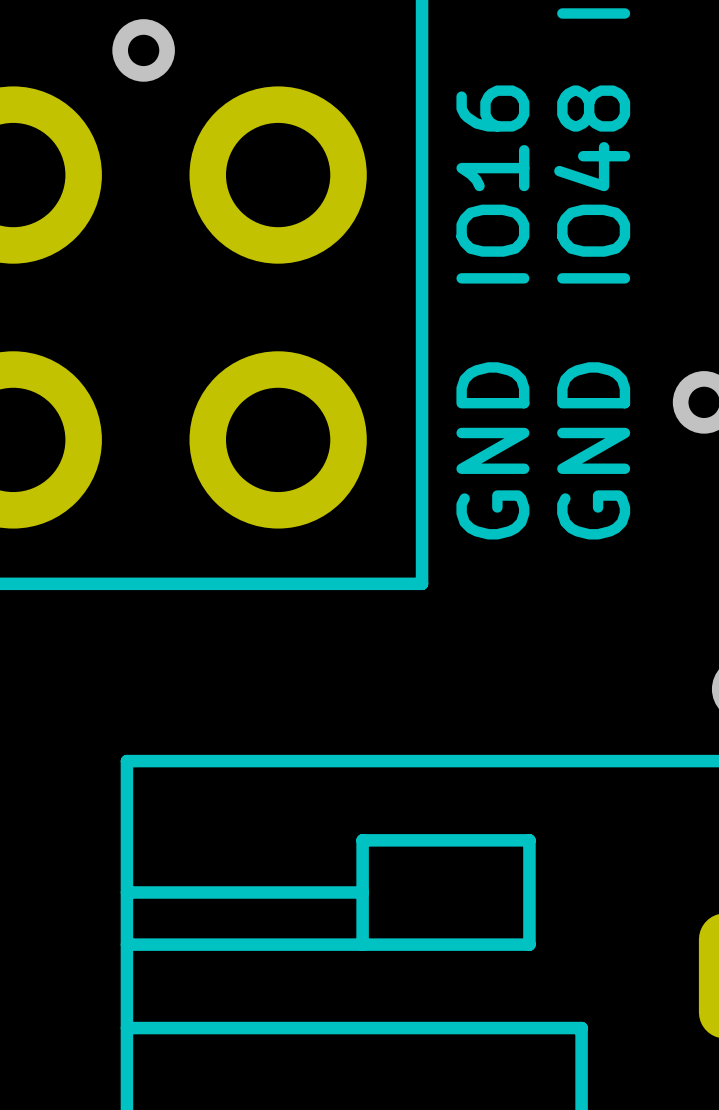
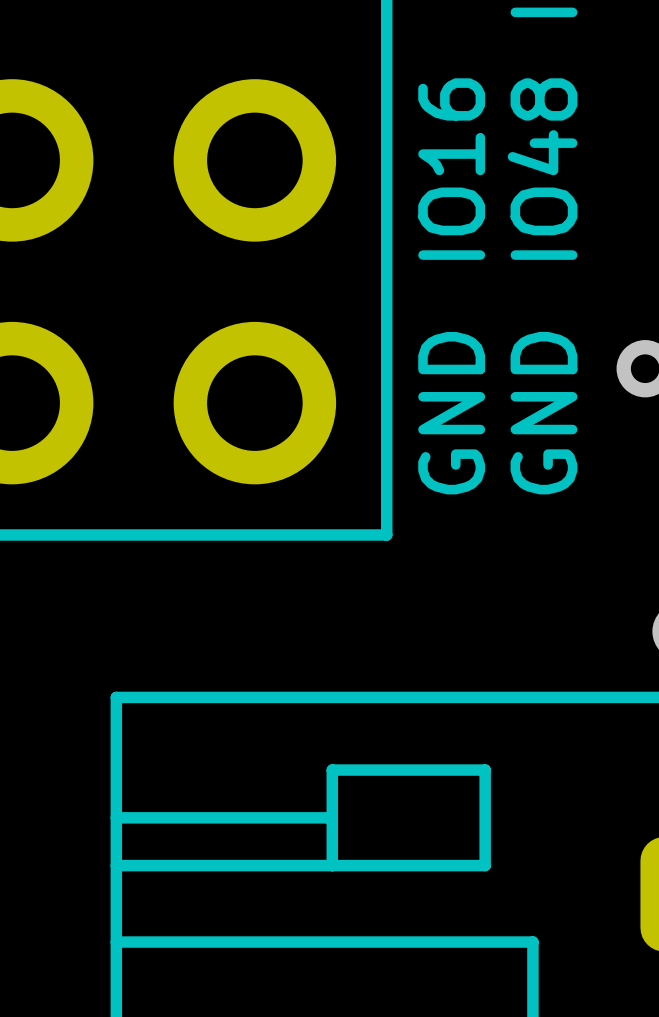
via: (143, 50) -> none

